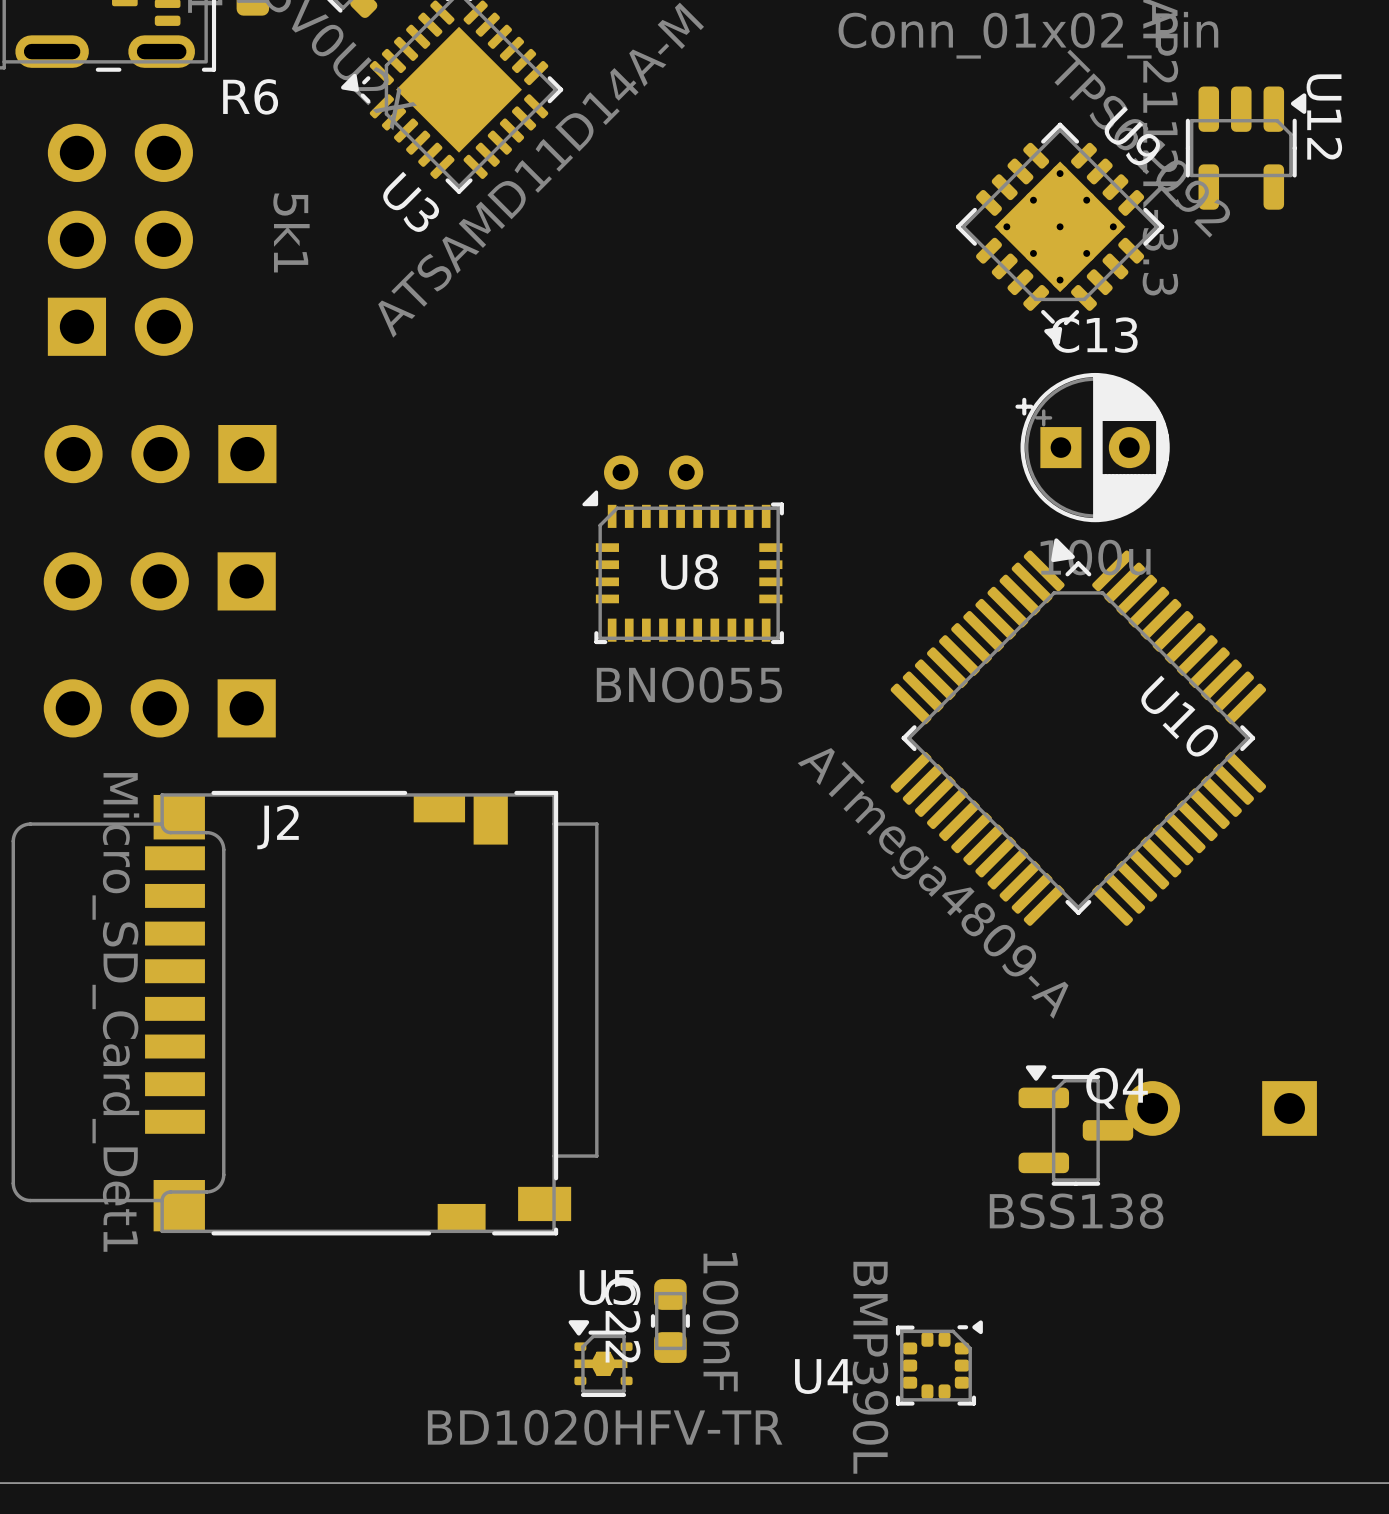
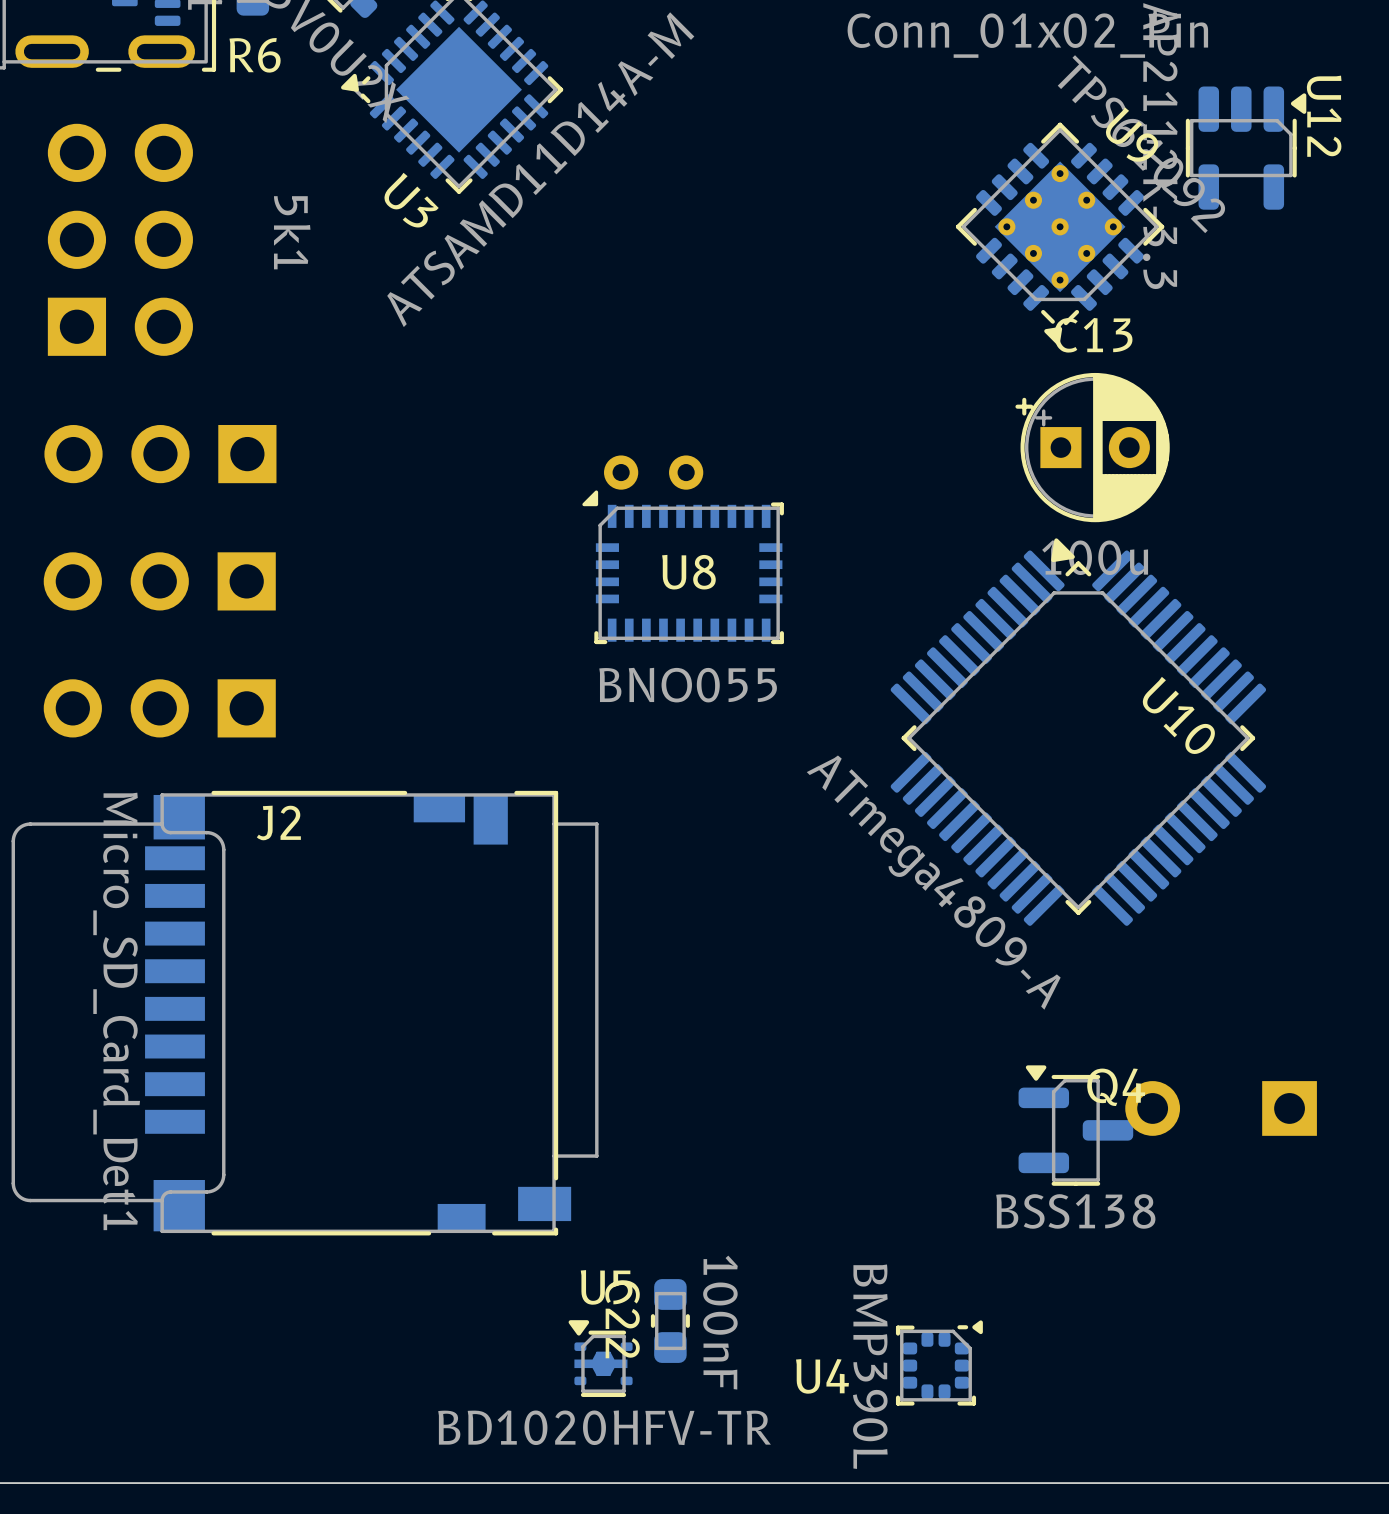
R6 name position: R6 (250, 96) -> R6 (255, 55)

